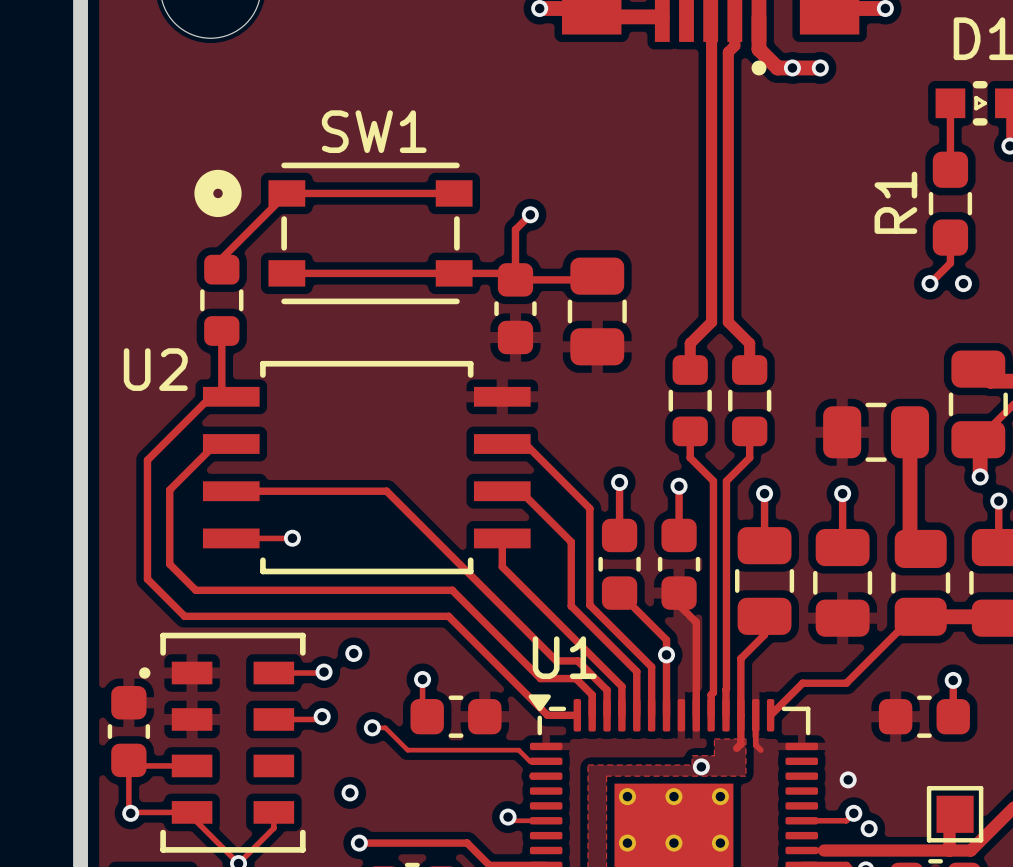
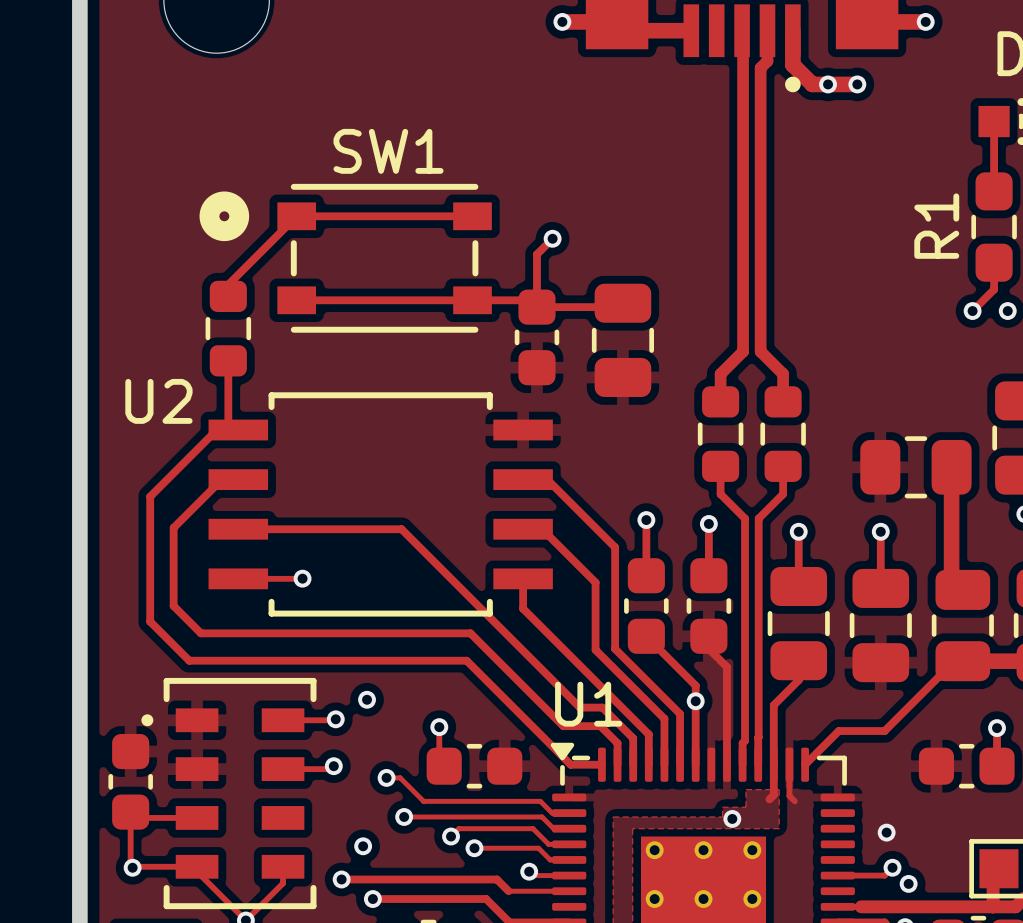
track: none -> (404, 816) (541, 816) (553, 828)
via: none -> (404, 816)
track: none -> (451, 836) (458, 828) (533, 828) (548, 844) (569, 844)
via: none -> (451, 836)
track: none -> (474, 848) (538, 848) (550, 859) (569, 859)
via: none -> (474, 848)
track: none -> (341, 879) (496, 879) (508, 891) (569, 891)
via: none -> (341, 879)

